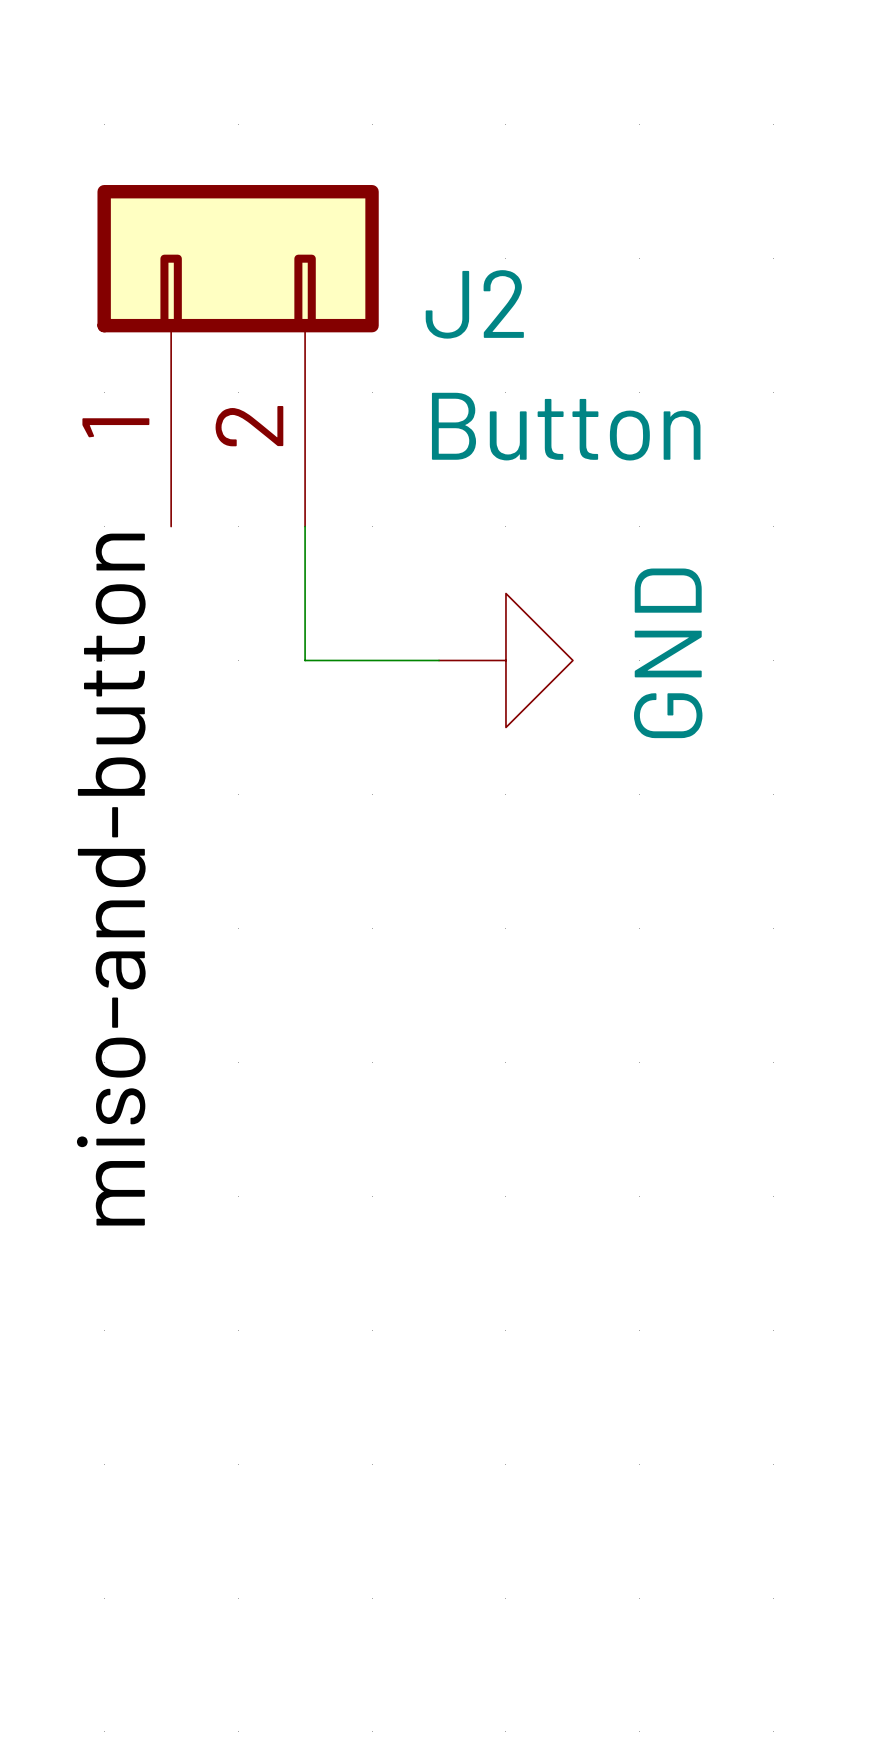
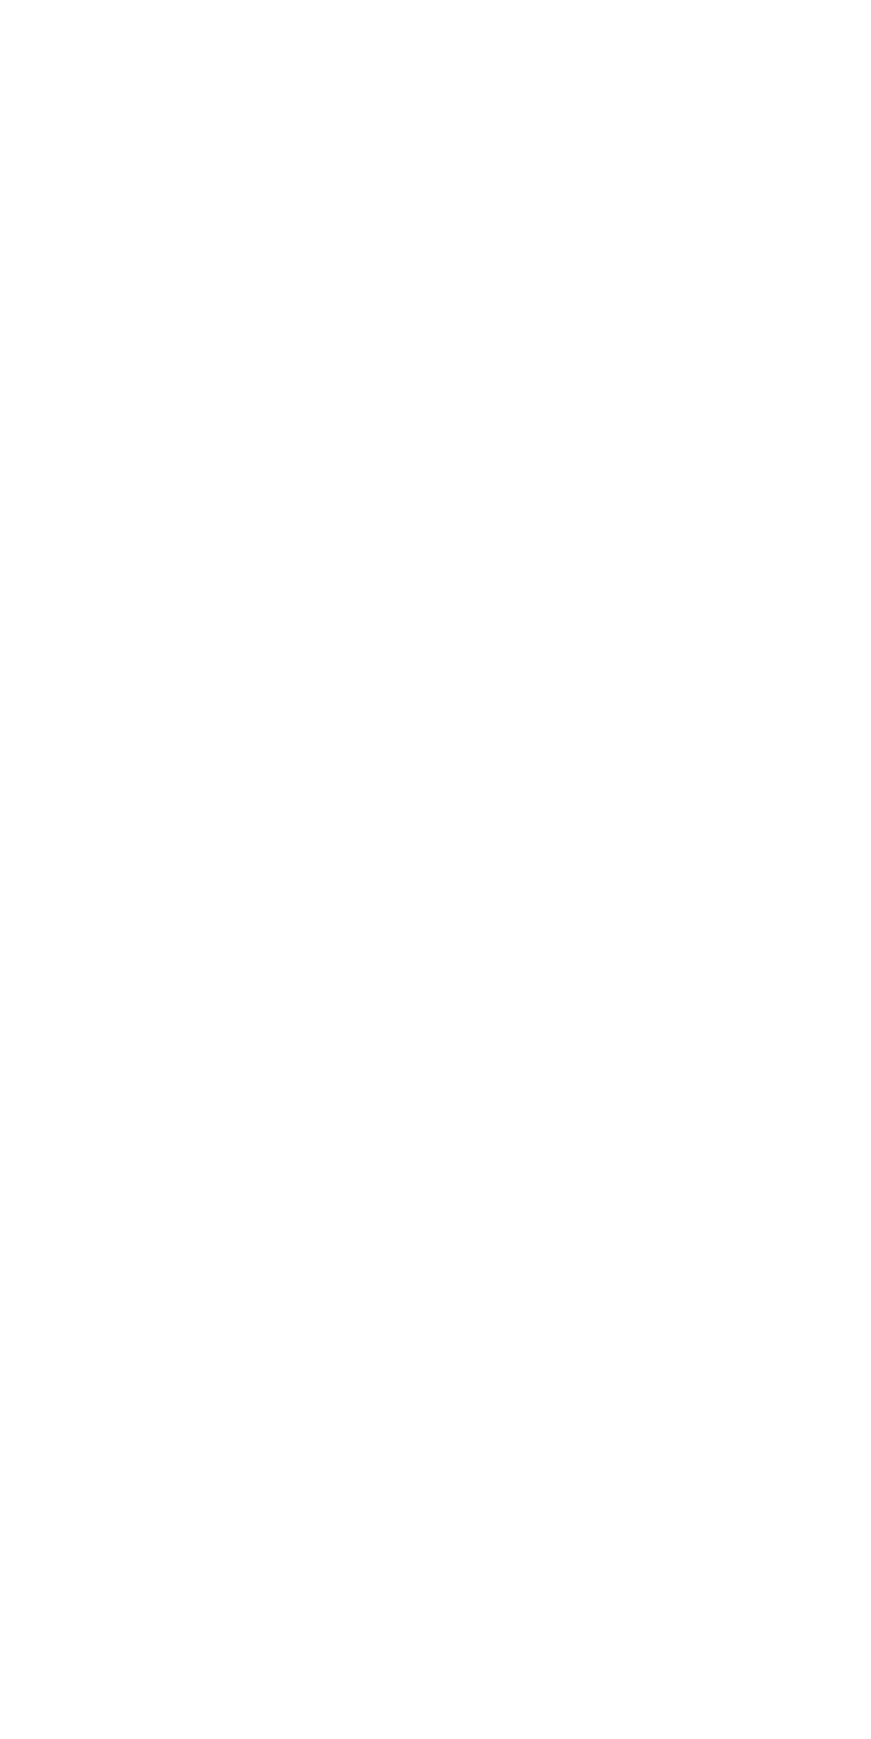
J2: Button (238, 355) -> none
wire: (305, 526) (305, 660) (439, 660) -> none
power symbol: GND (505, 660) -> none
label: miso-and-button (111, 879) -> none

